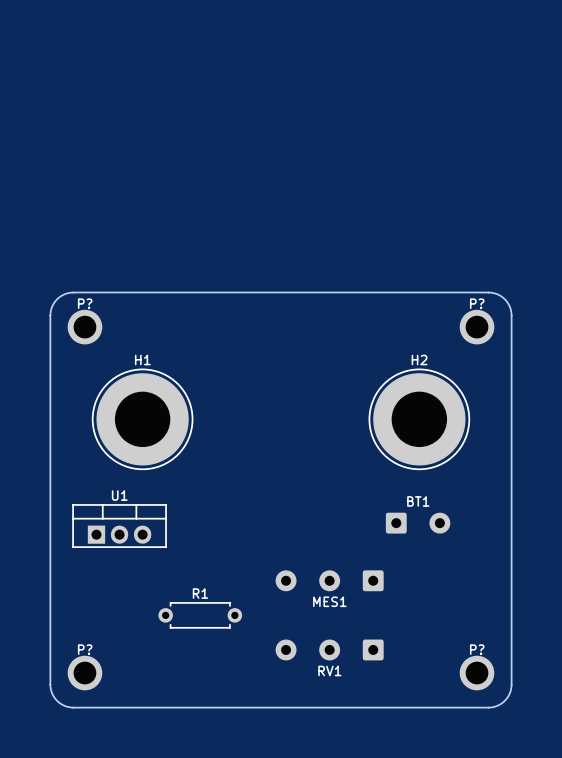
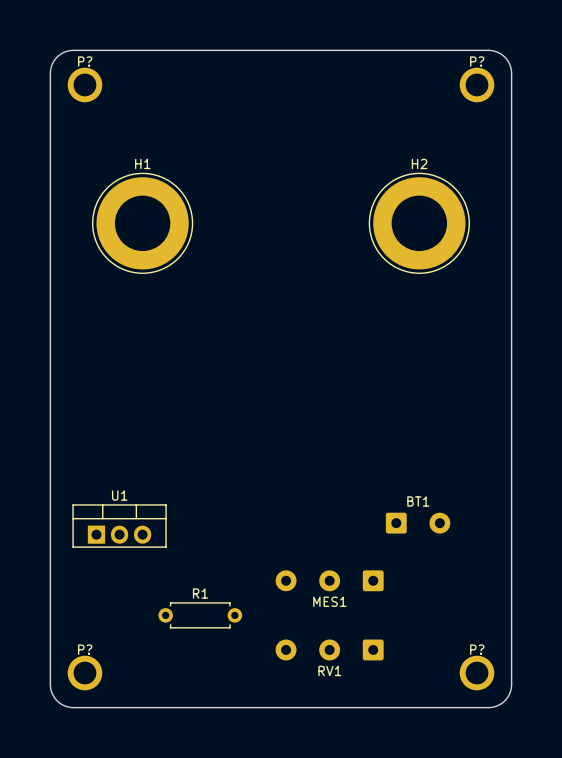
P?: none -> (84, 84)
P?: none -> (477, 84)
board edge: (50, 315) (52, 306) (57, 299) (64, 294) (73, 292) (488, 292) (497, 294) (504, 299) (509, 306) (511, 315) -> (50, 315) (50, 70) (57, 57) (64, 52) (73, 50) (488, 50) (500, 53) (508, 61) (511, 73) (511, 315)
P?: (84, 327) -> none
P?: (477, 327) -> none
H1 position: (142, 419) -> (142, 223)
H2 position: (419, 419) -> (419, 223)

